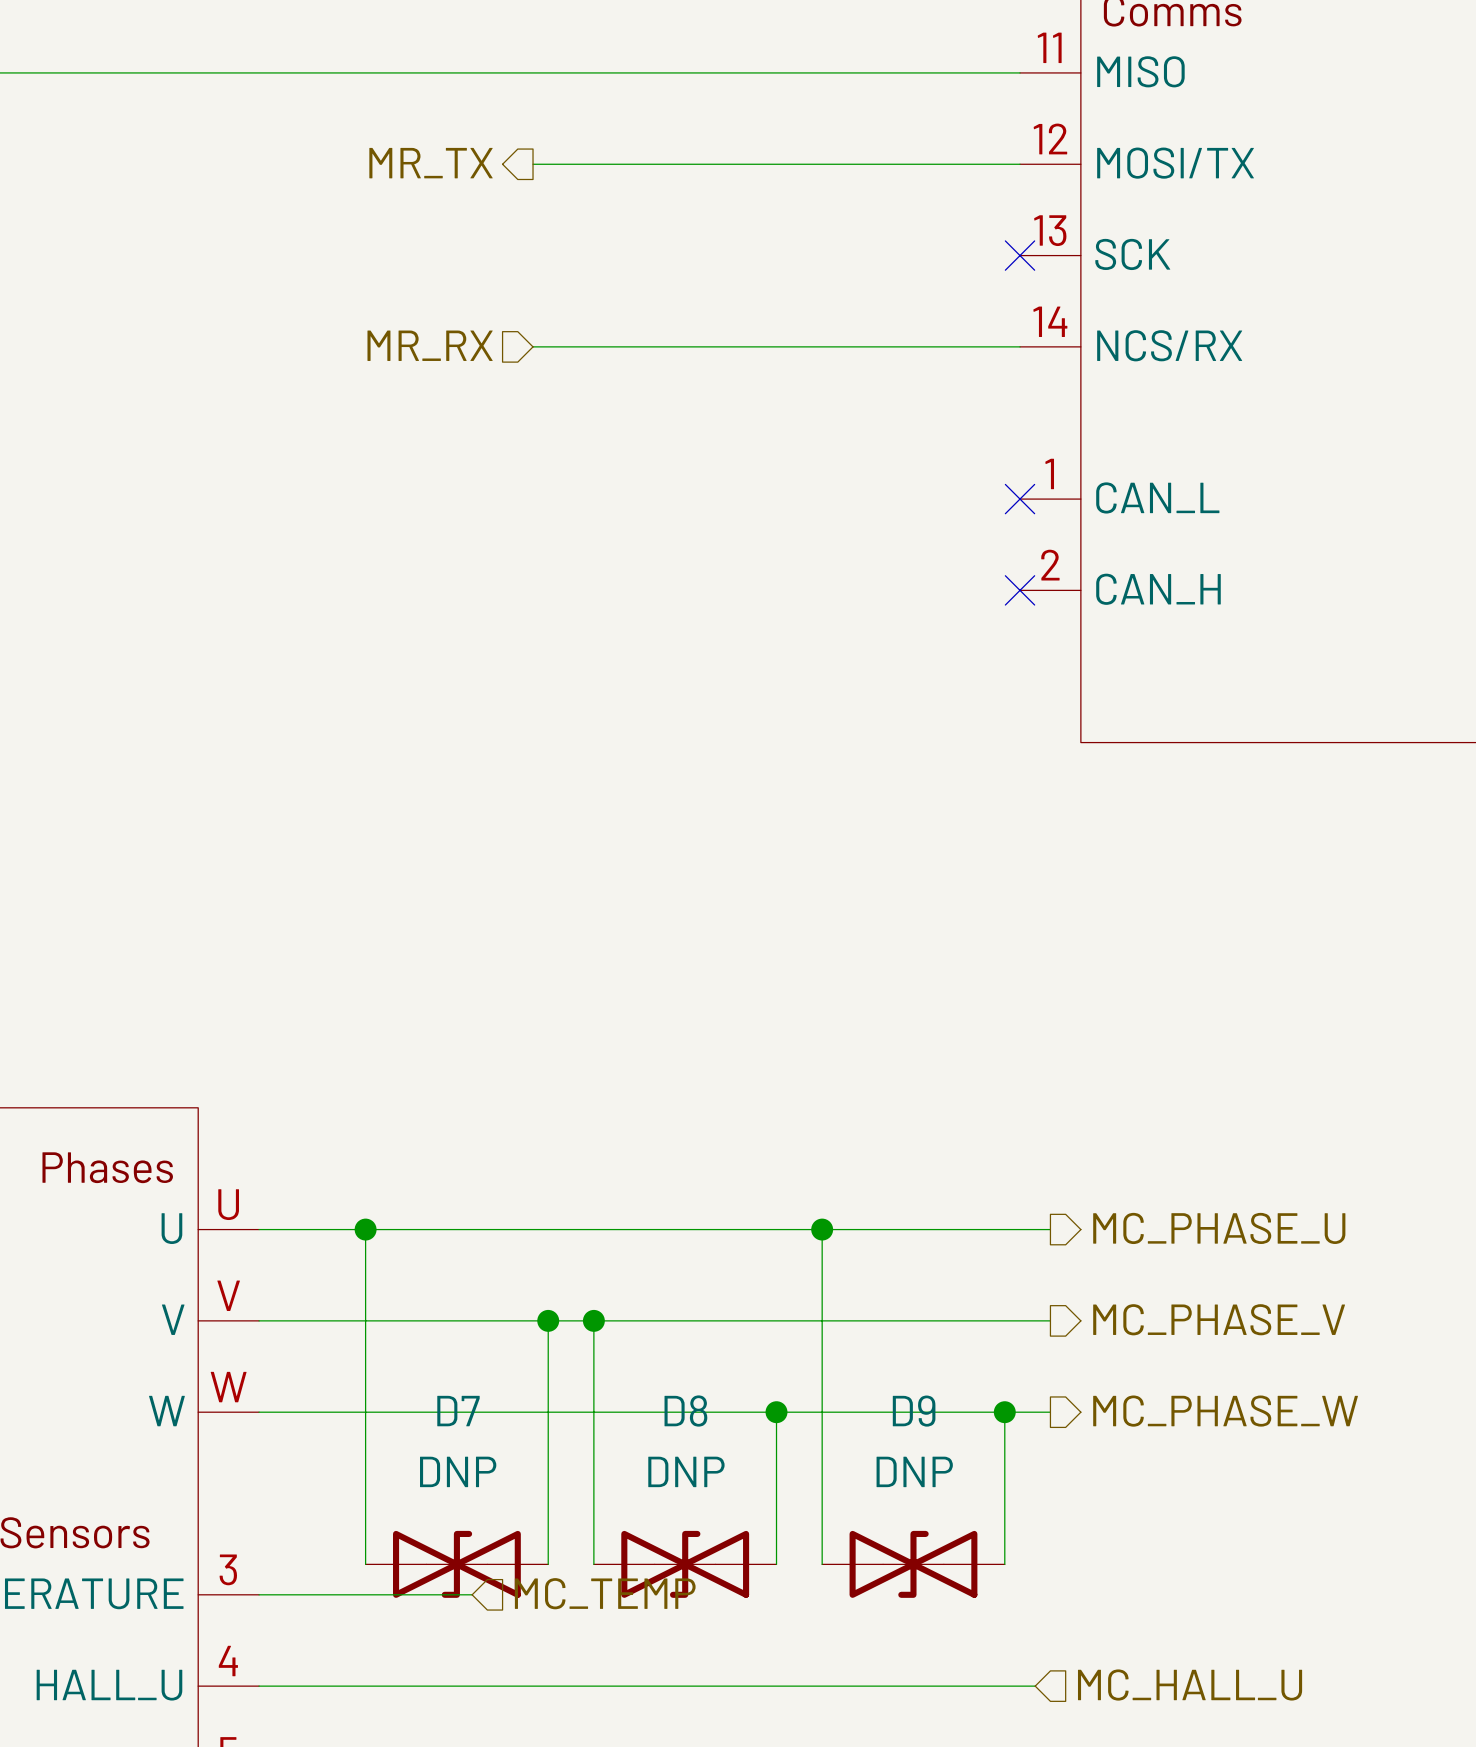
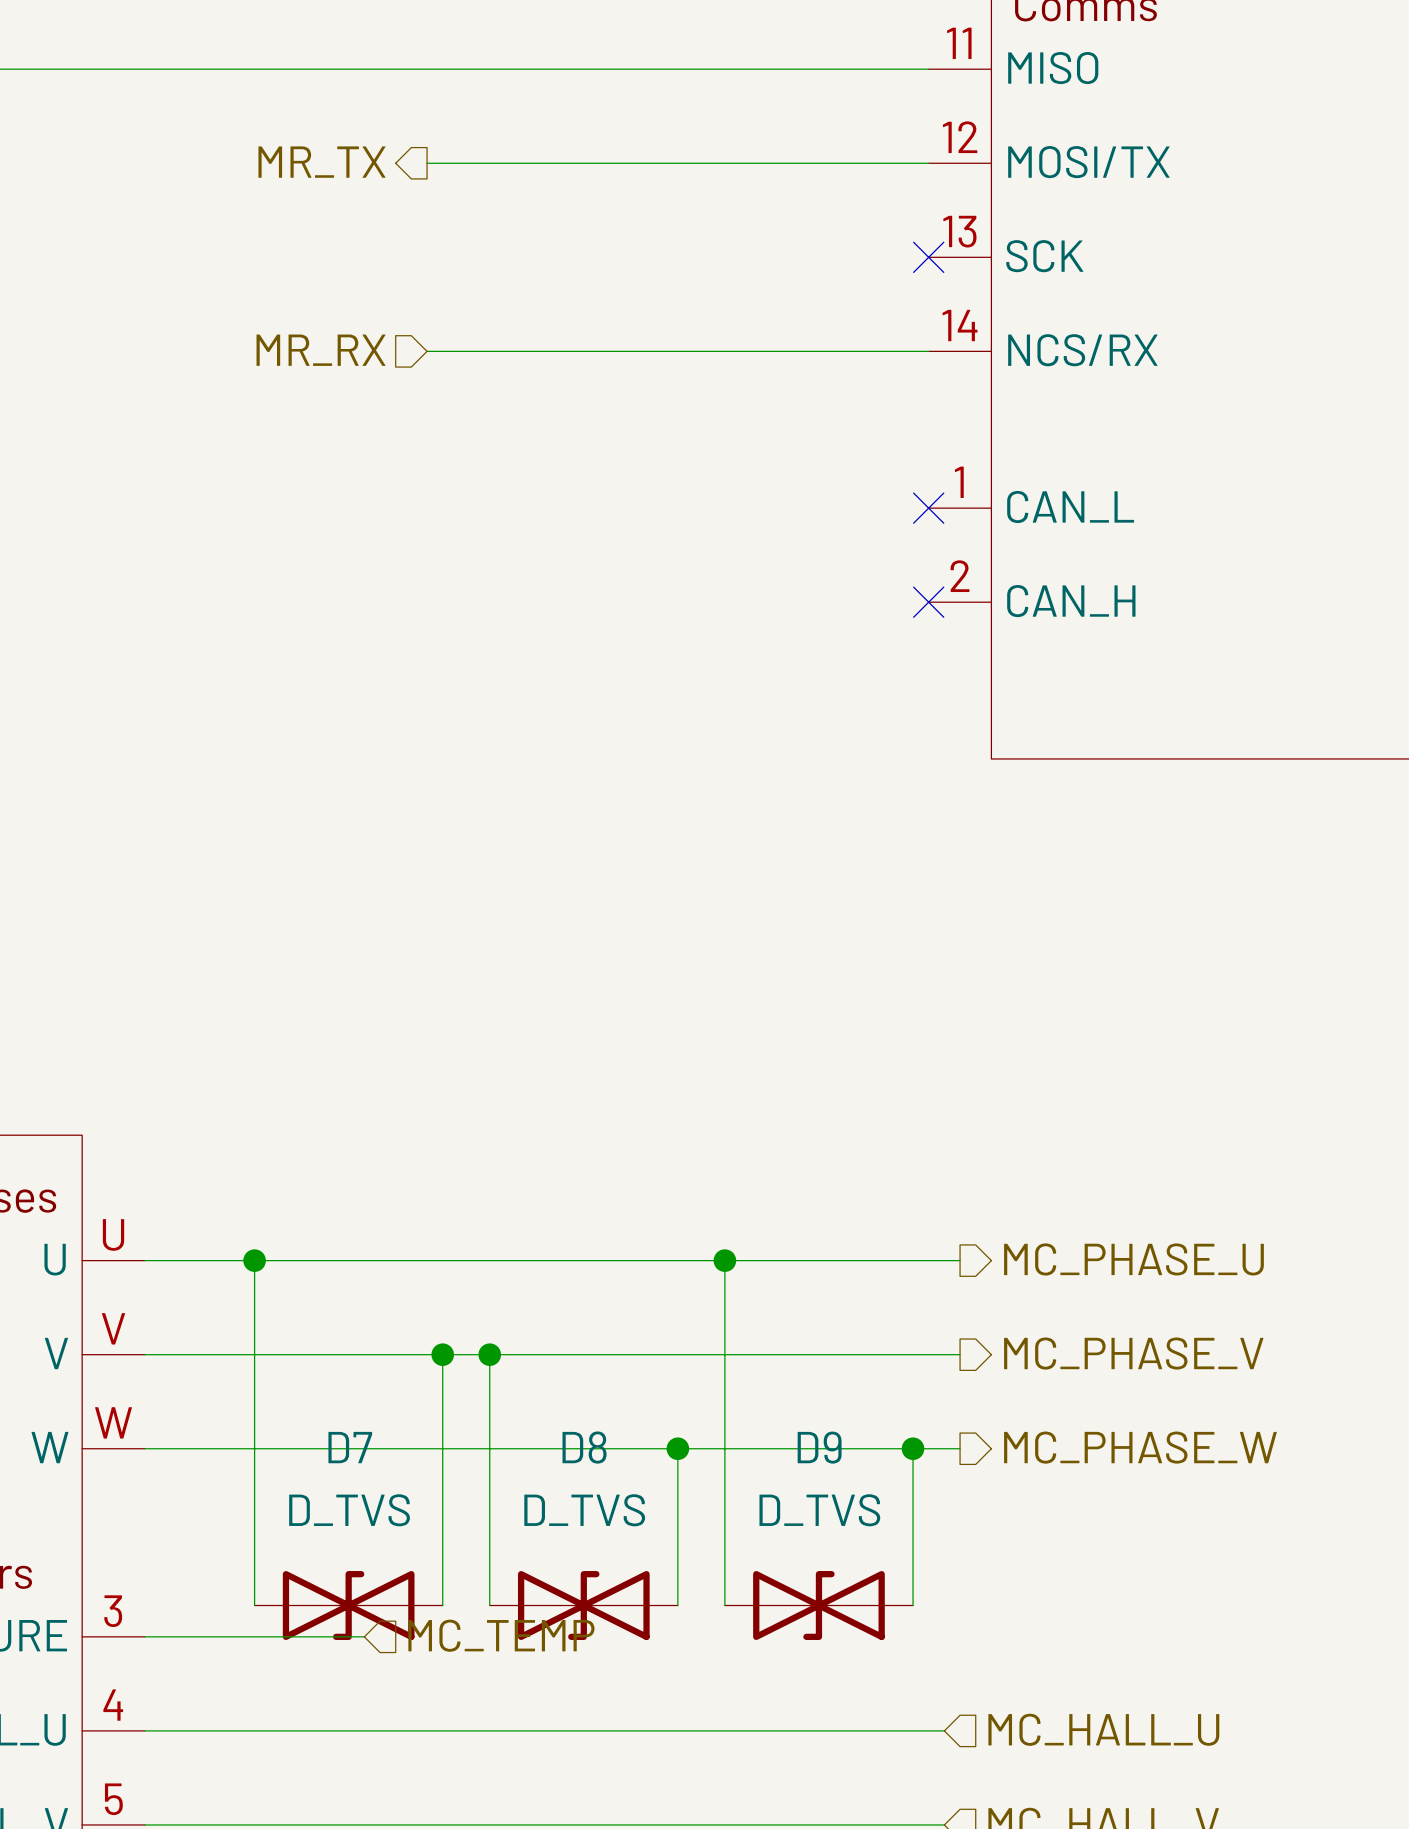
D7 value: DNP (458, 1471) -> D_TVS (349, 1510)
D8 value: DNP (686, 1471) -> D_TVS (584, 1510)
D9 value: DNP (914, 1471) -> D_TVS (819, 1510)

